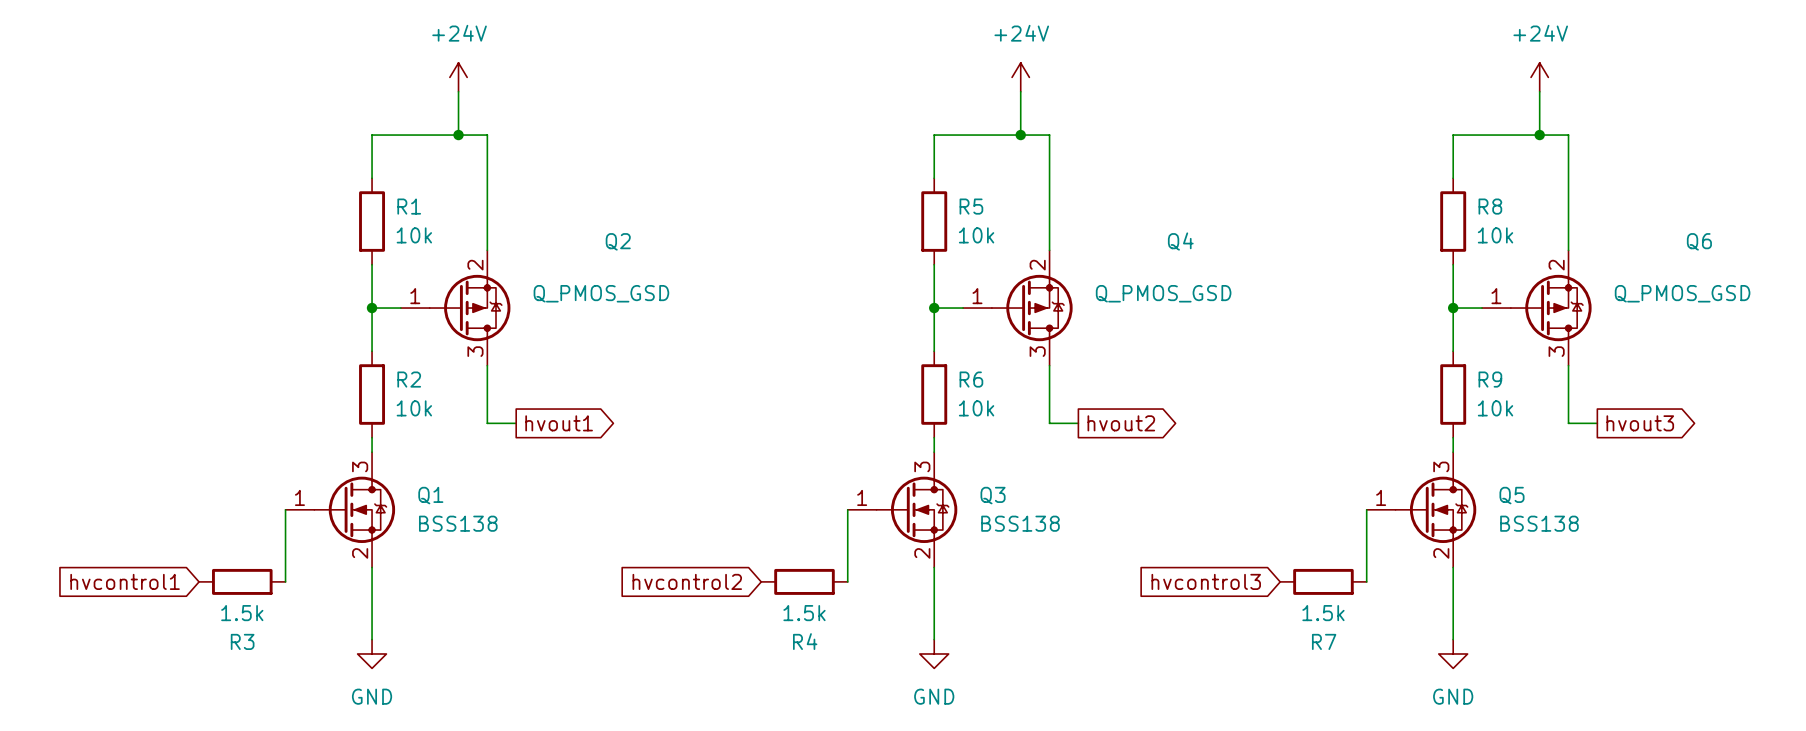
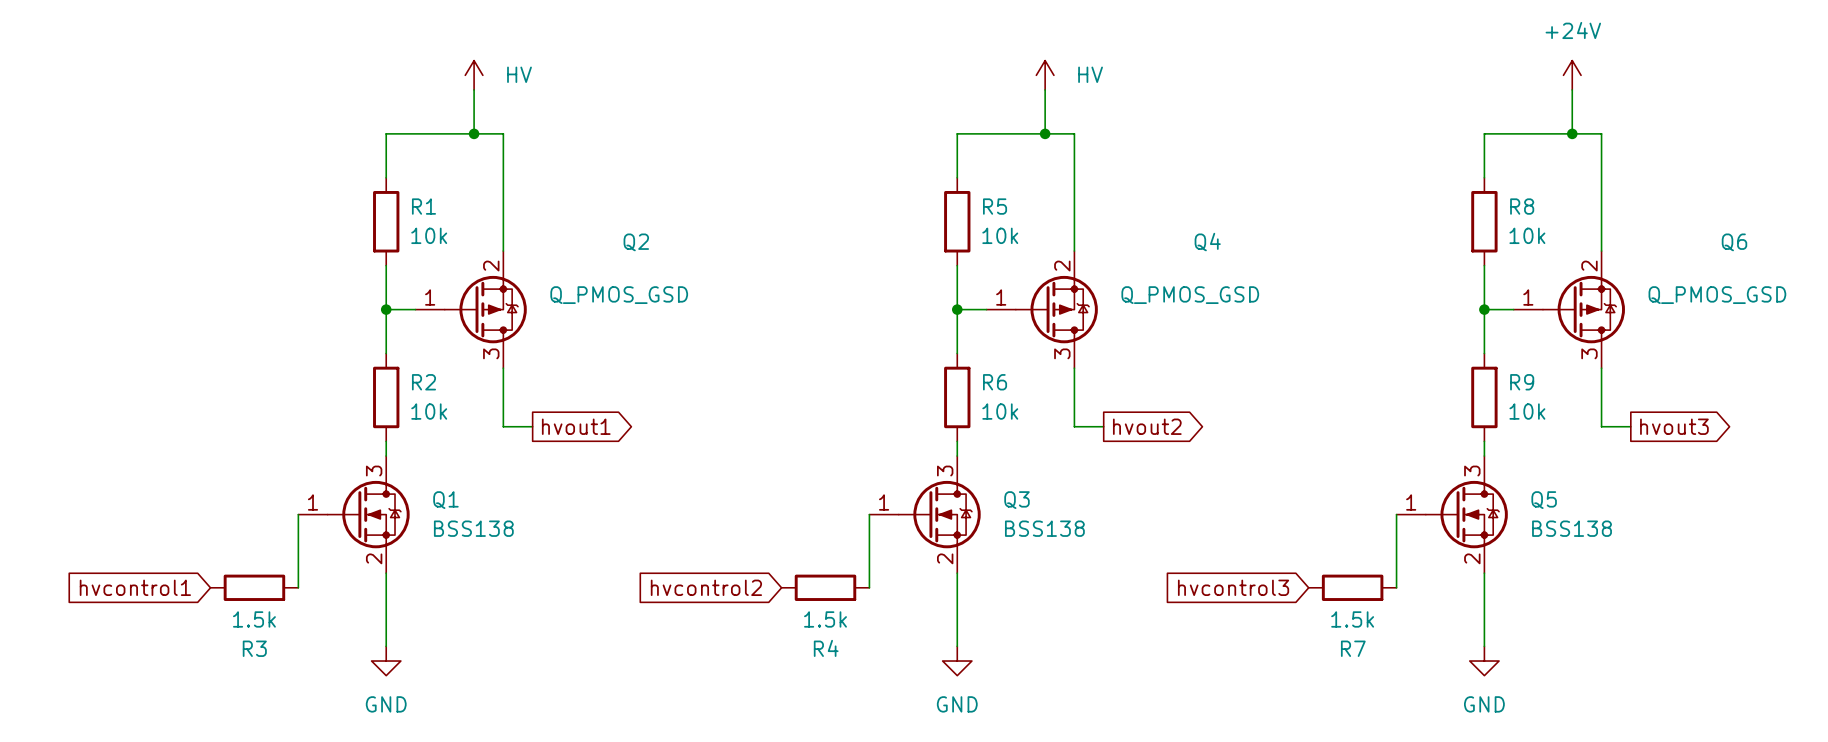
power symbol: +24V (458, 77) -> HV (474, 75)
power symbol: +24V (1020, 77) -> HV (1045, 75)

